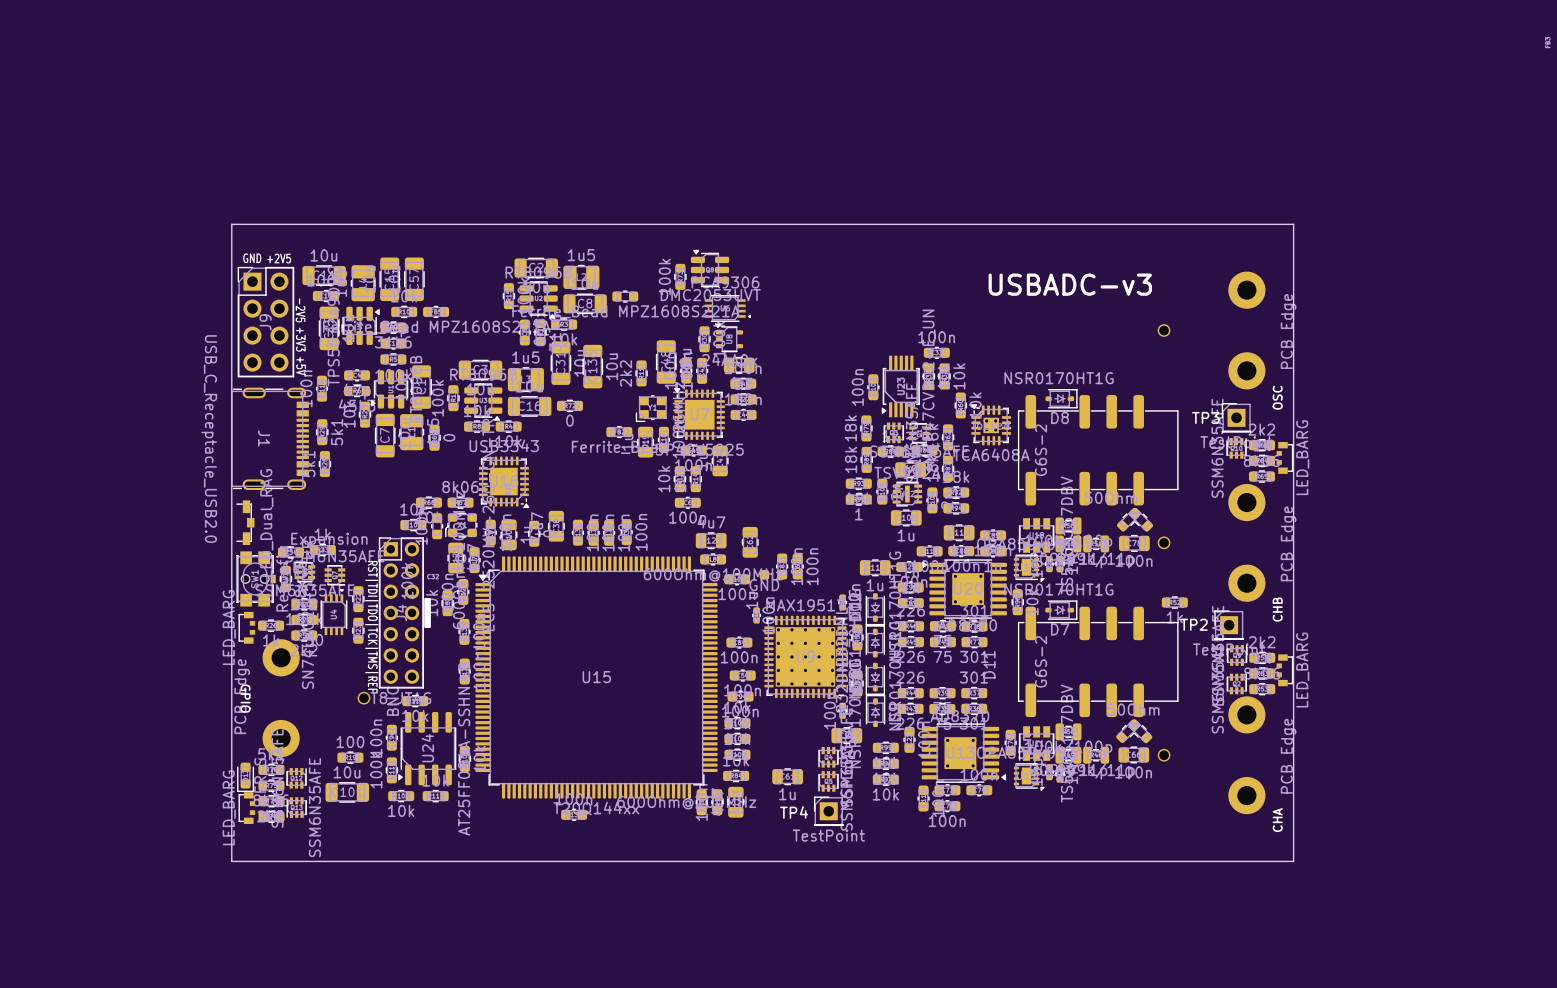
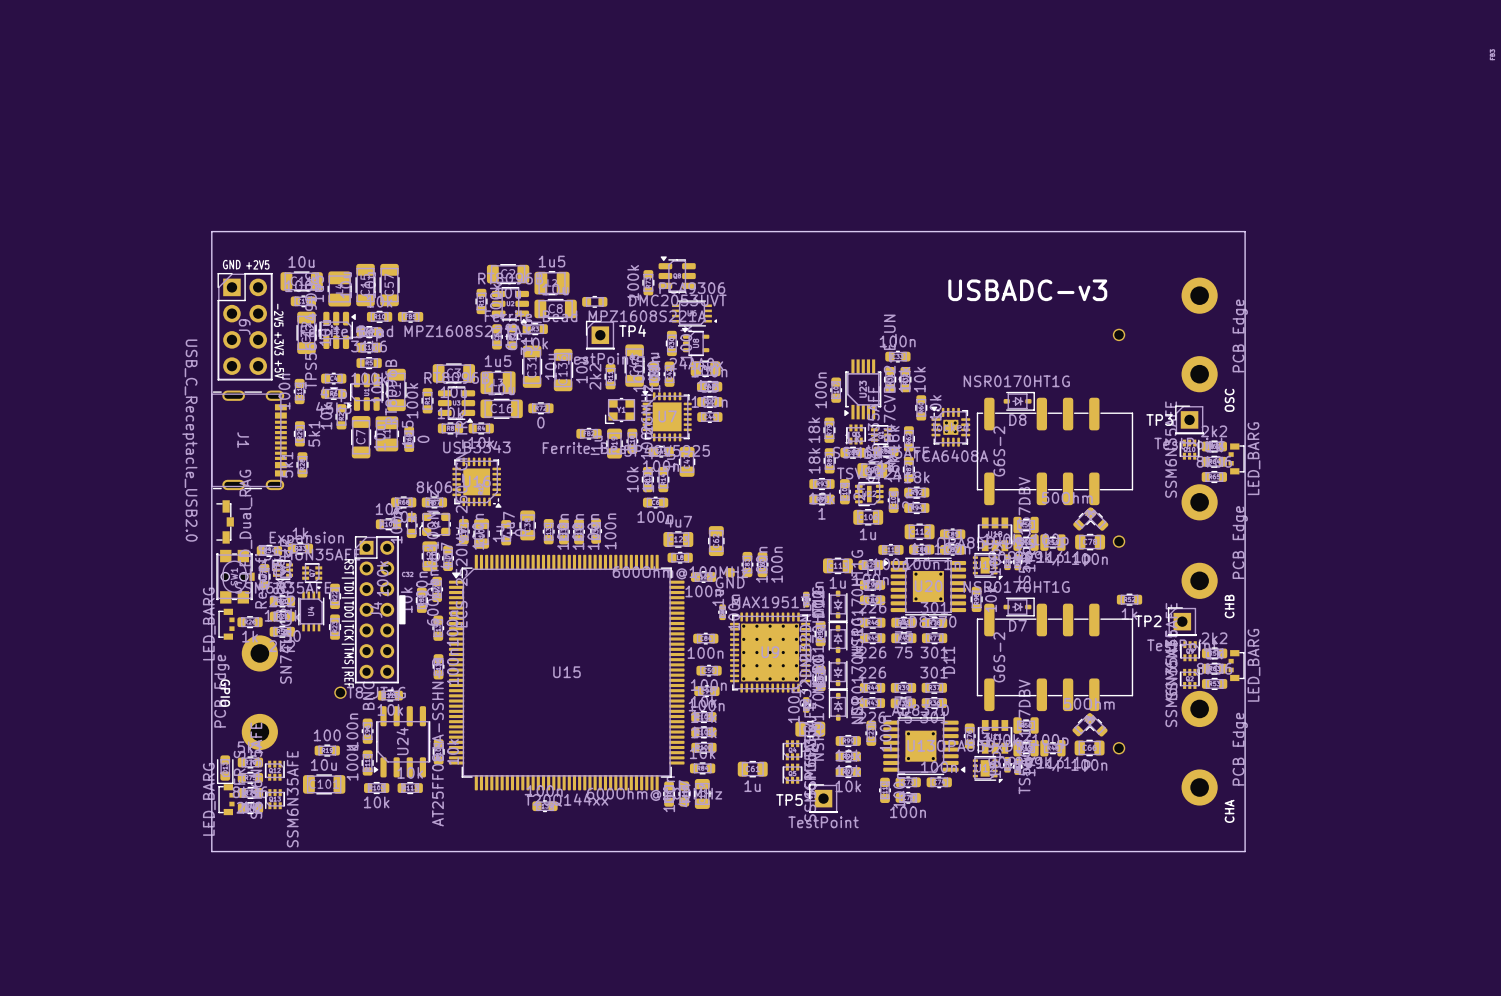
TP5: none -> TestPoint (823, 798)
TP4 position: (828, 811) -> (600, 335)
TP4 name position: TP4 (794, 812) -> TP4 (632, 330)

